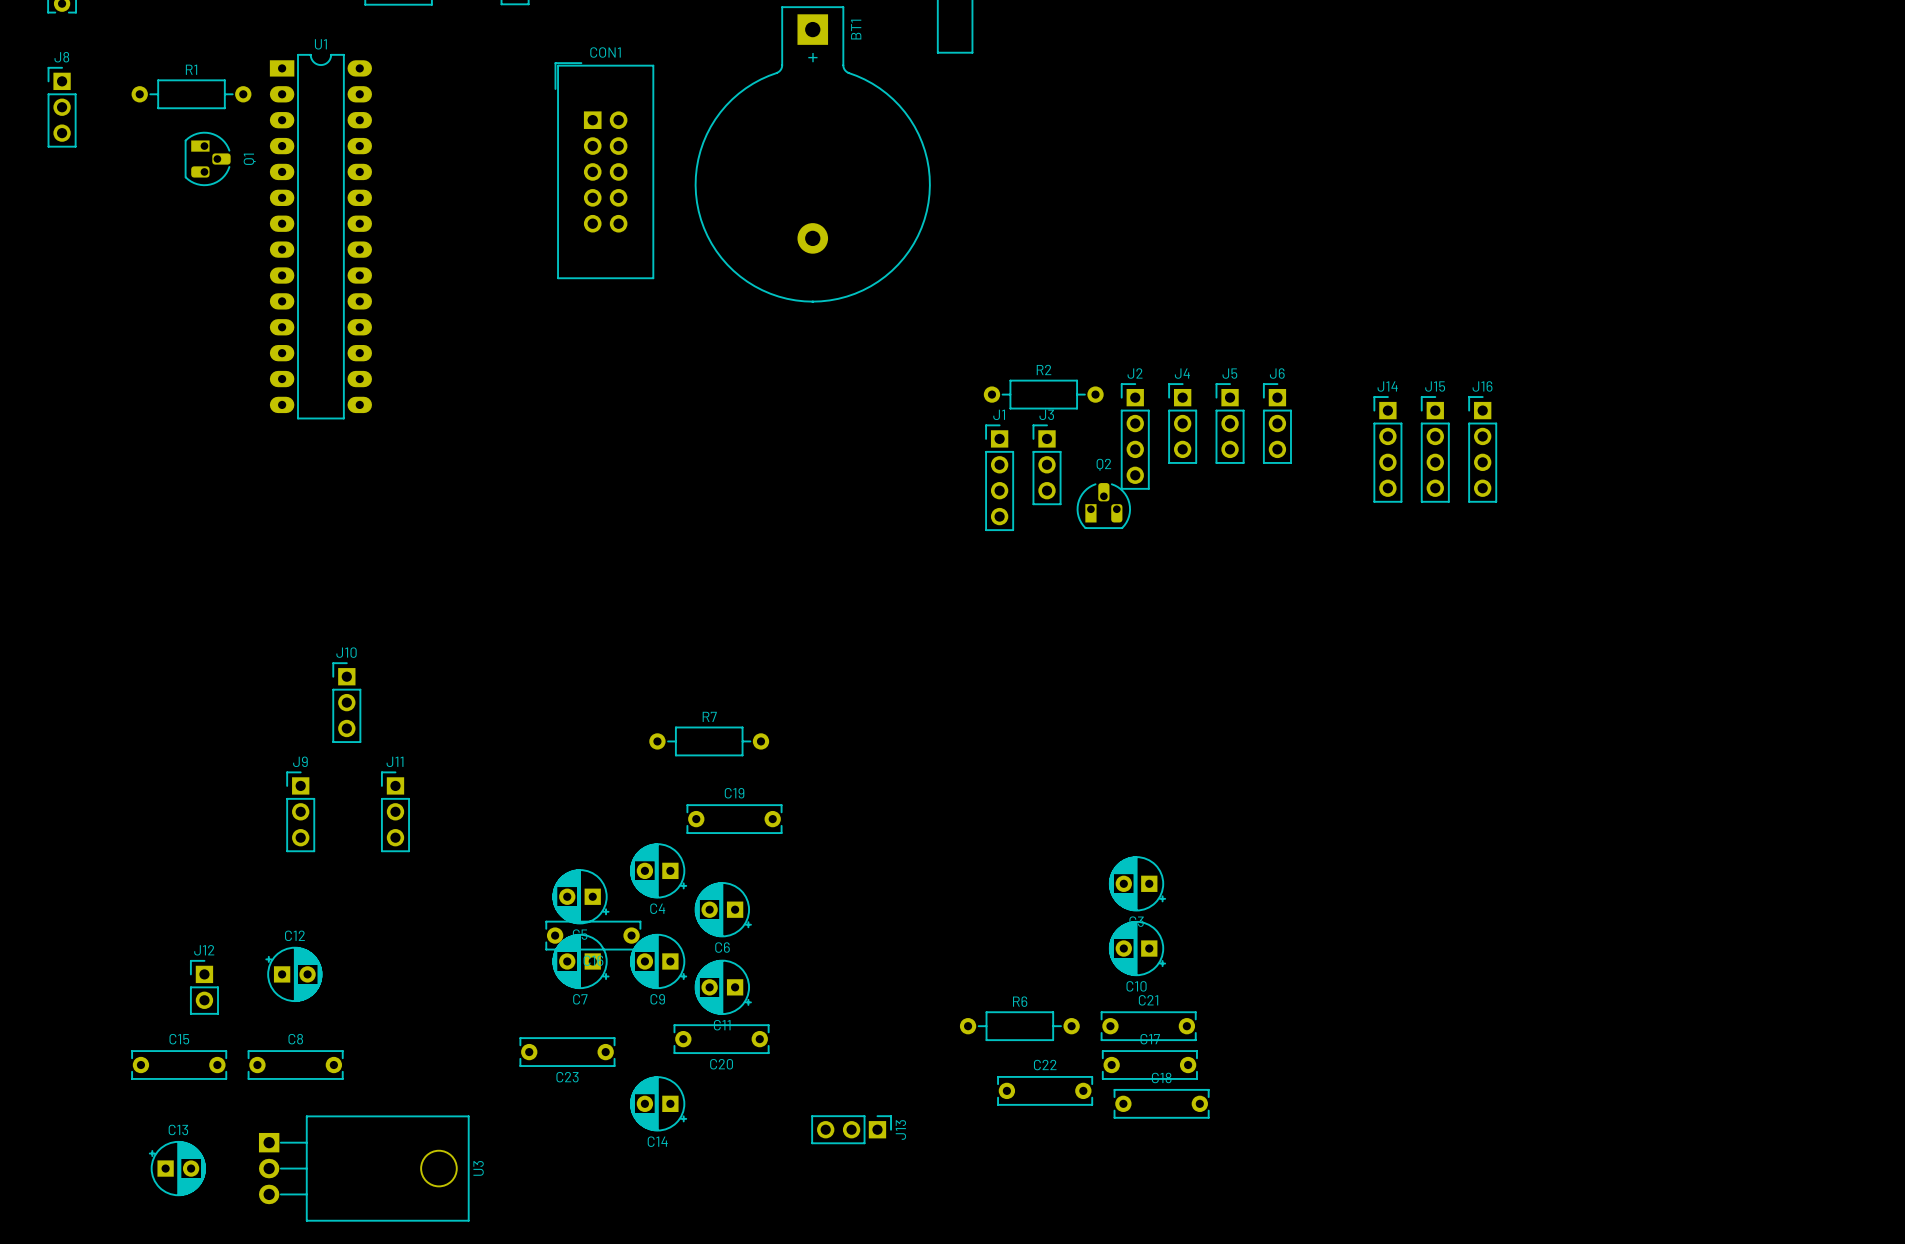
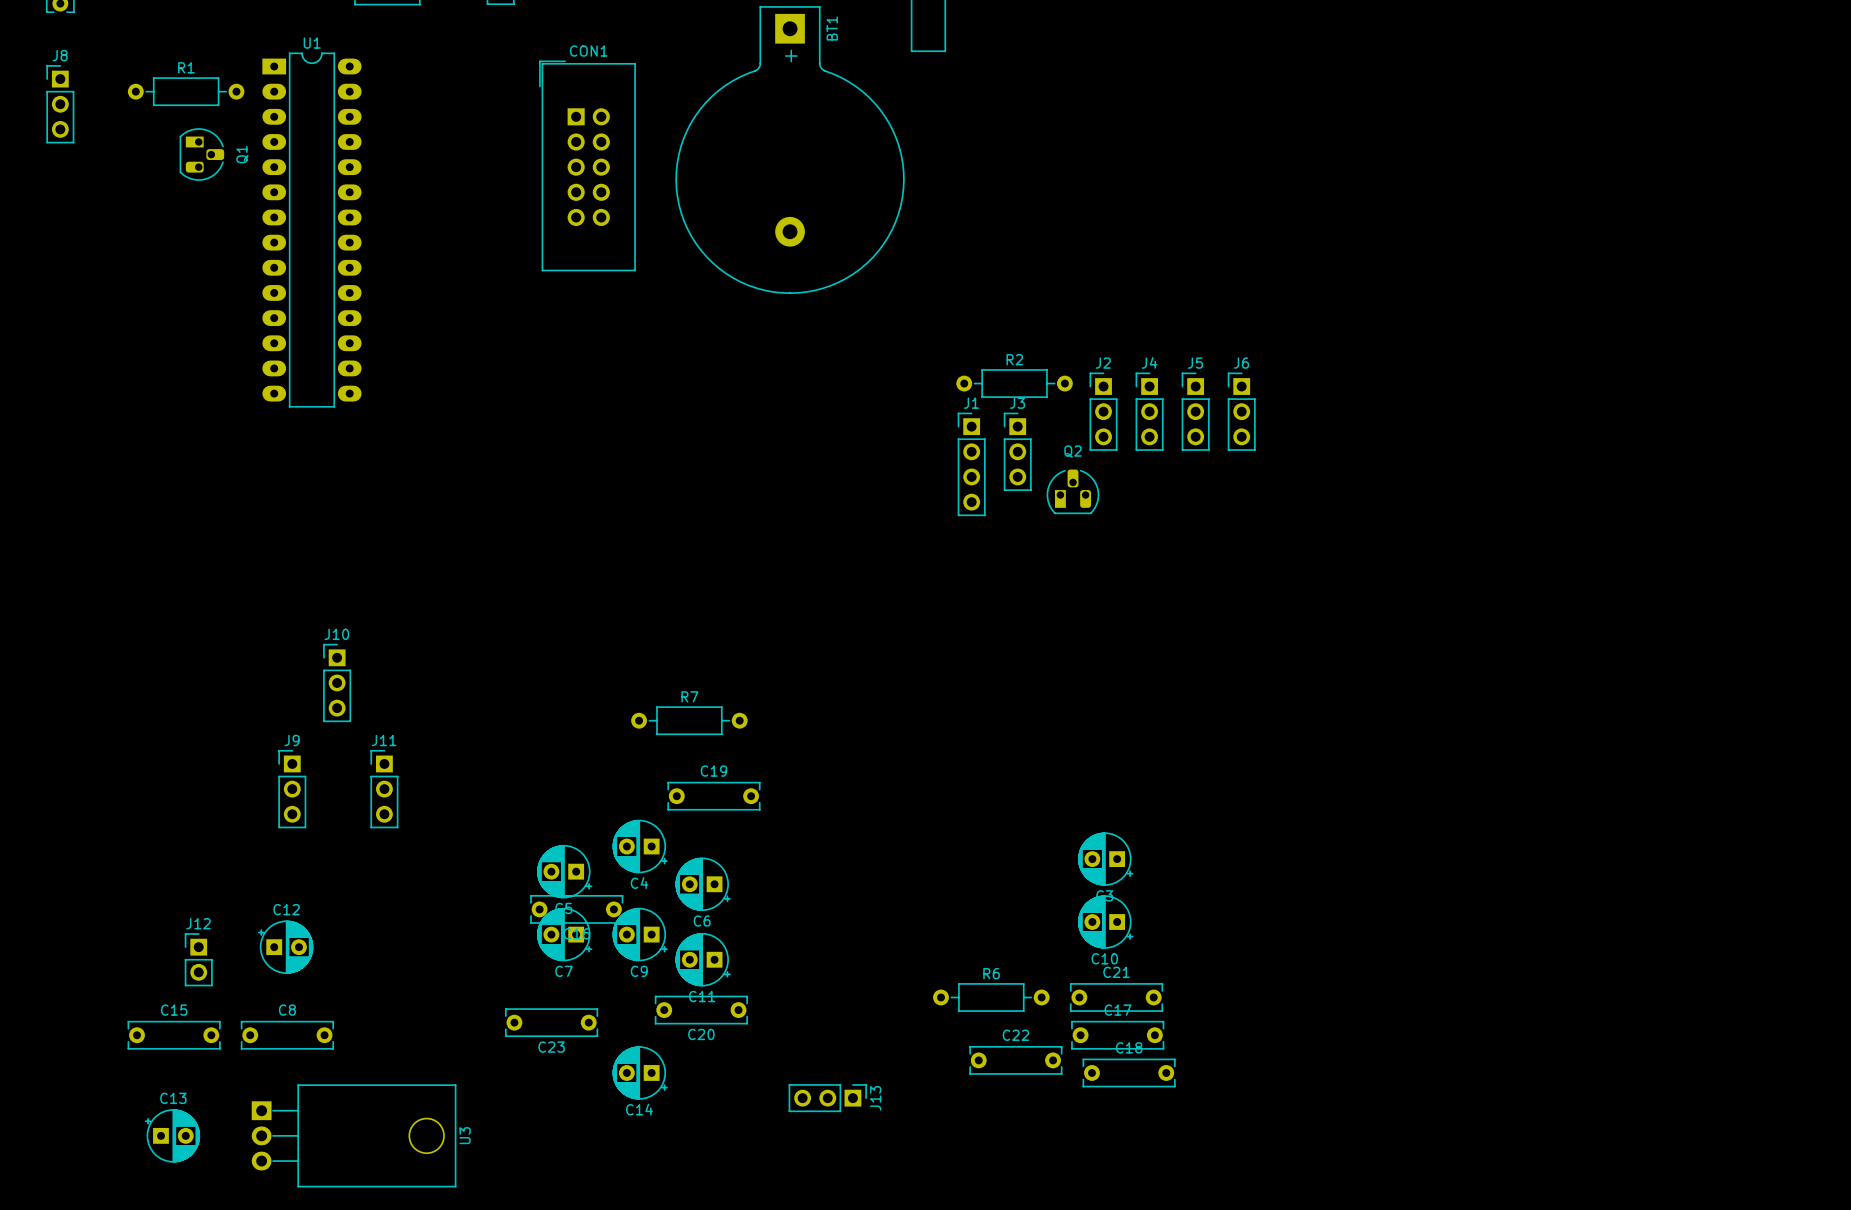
J2 footprint: [1121, 383, 1150, 490] -> [1089, 372, 1118, 451]
J14: (1387, 449) -> none
J15: (1435, 449) -> none
J16: (1482, 449) -> none

